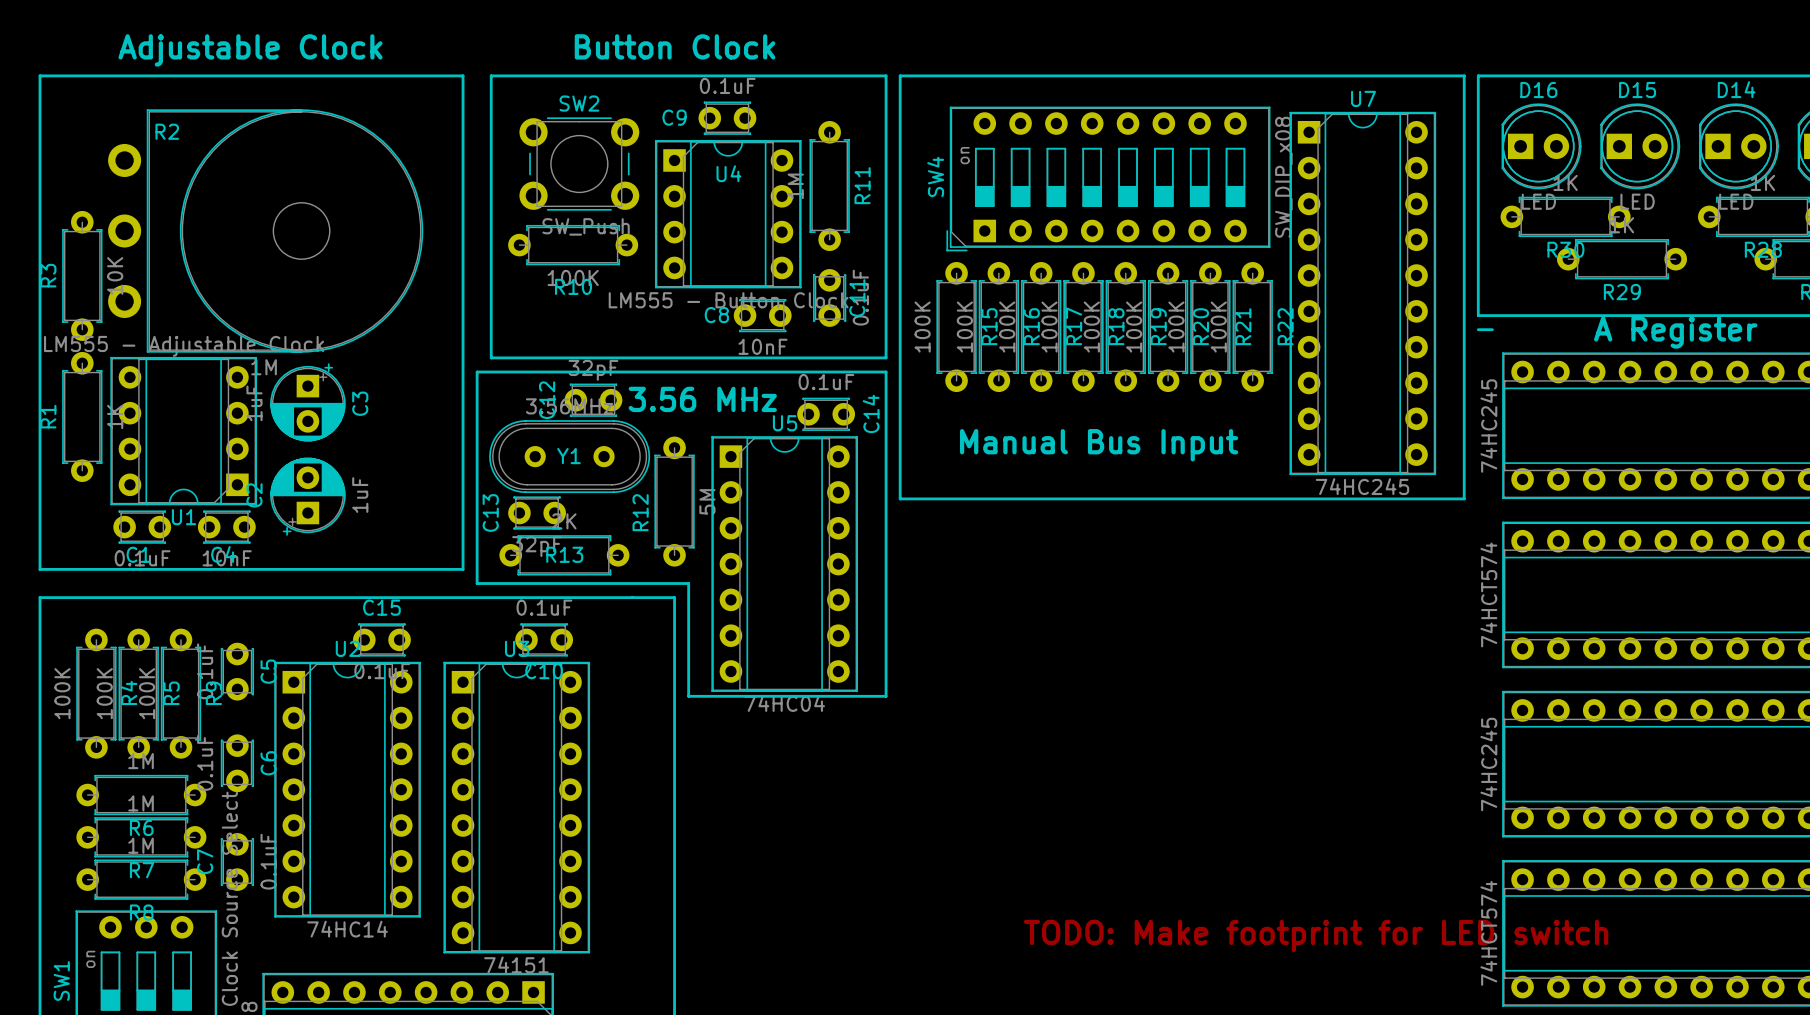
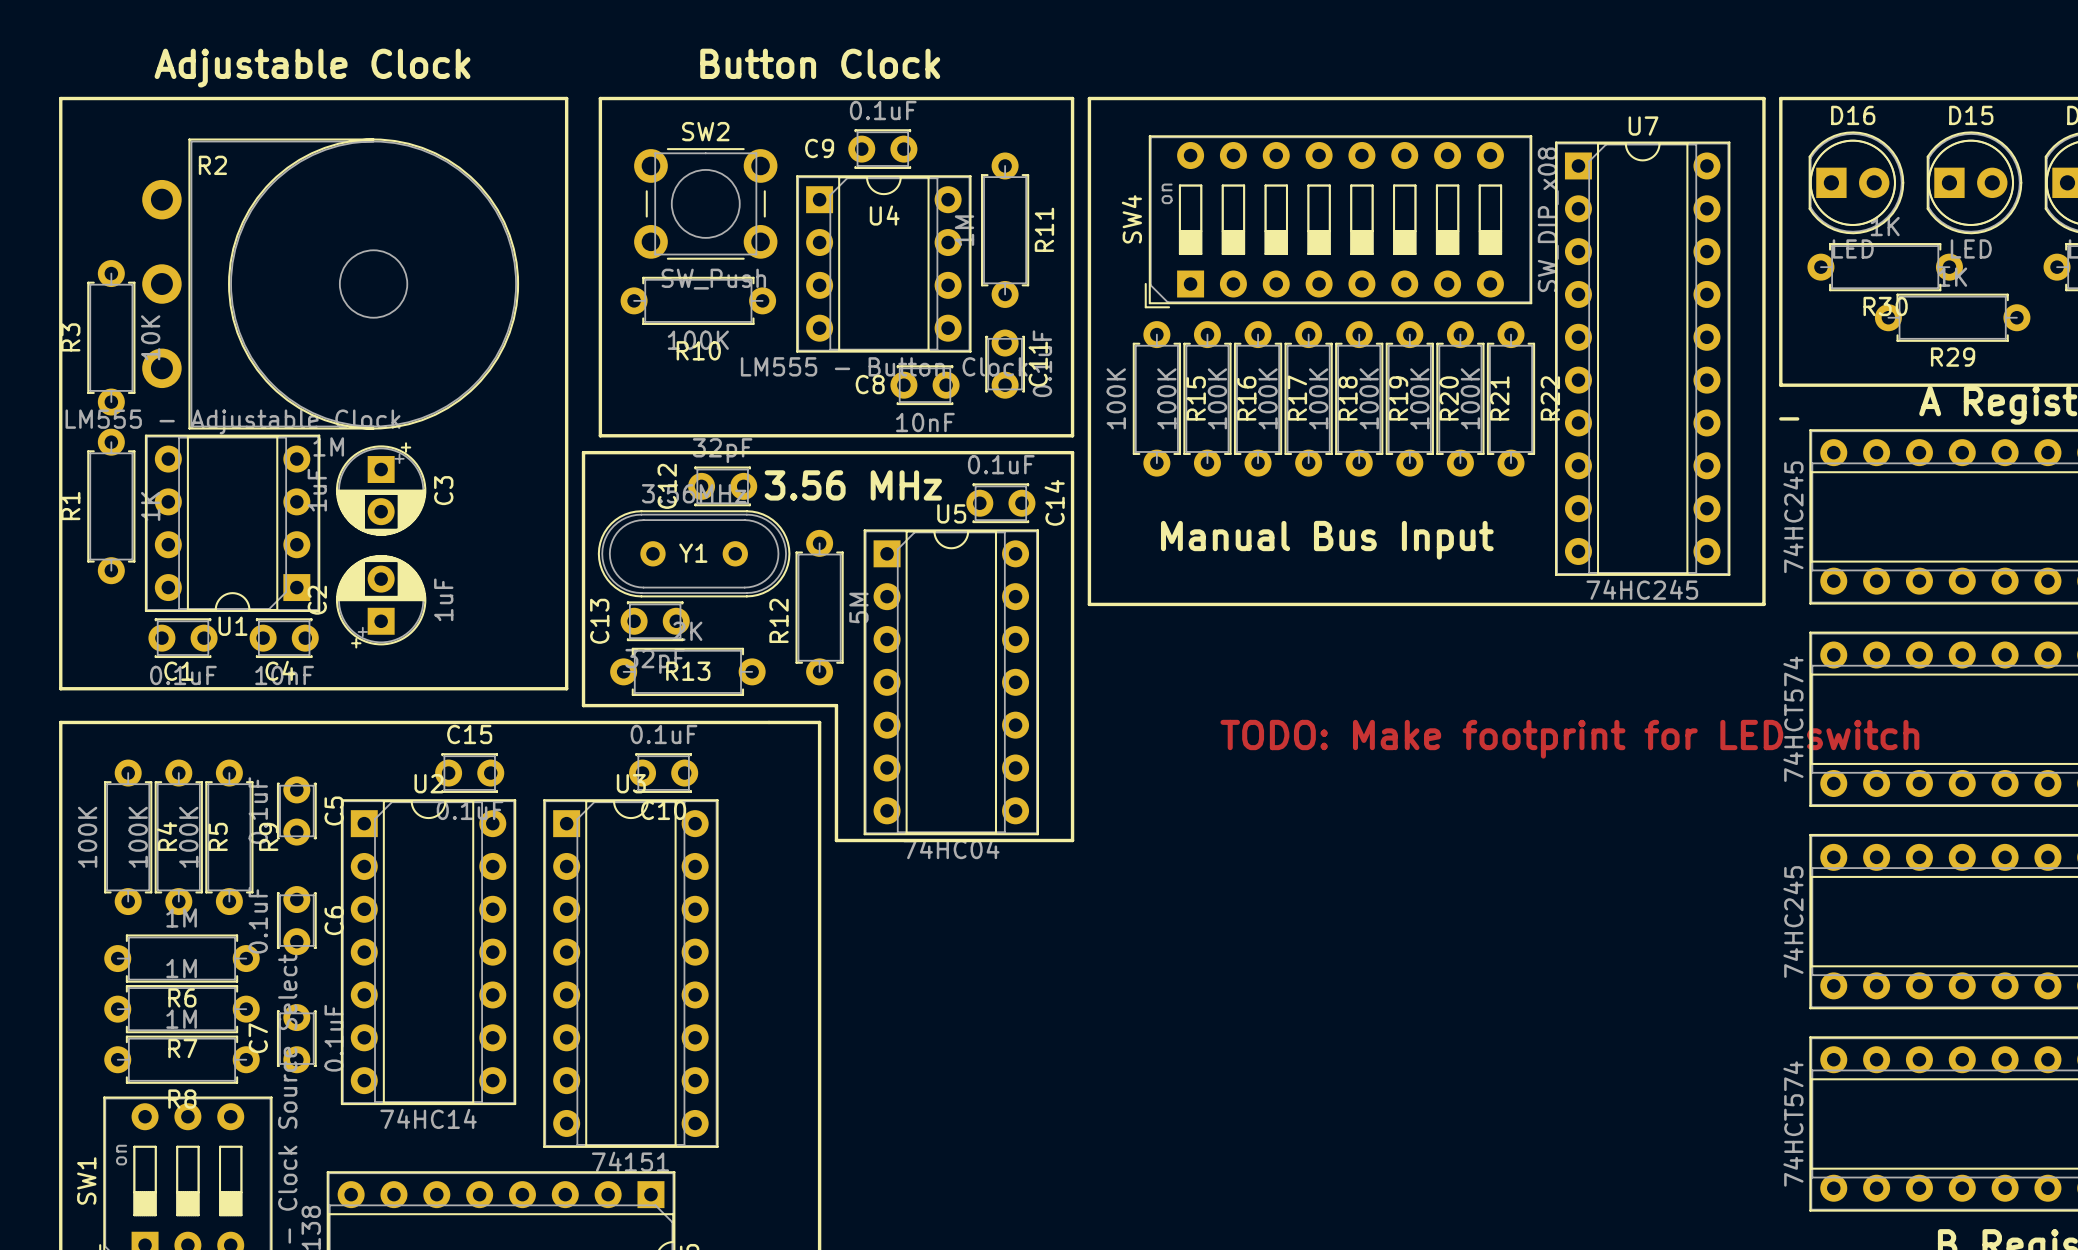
line: (1478, 329) (1492, 329) -> (1780, 418) (1797, 418)
text position: TODO: Make footprint for LED switch (1316, 935) -> TODO: Make footprint for LED switch (1569, 739)

